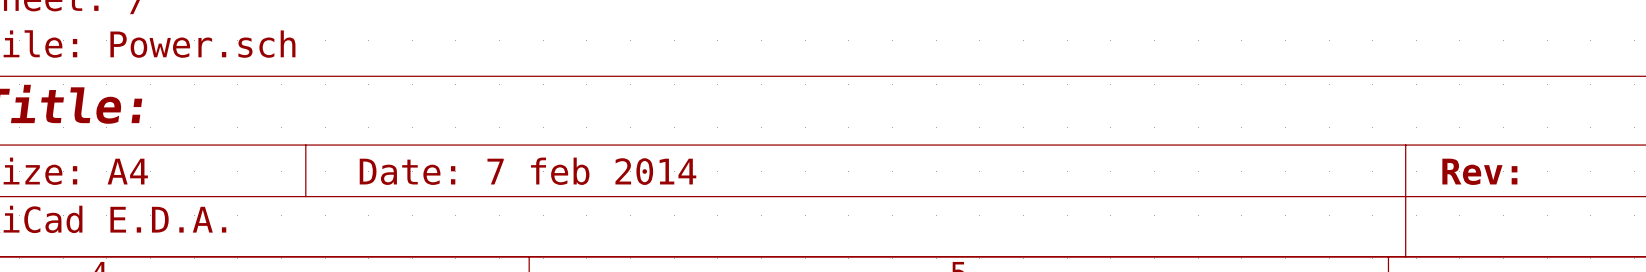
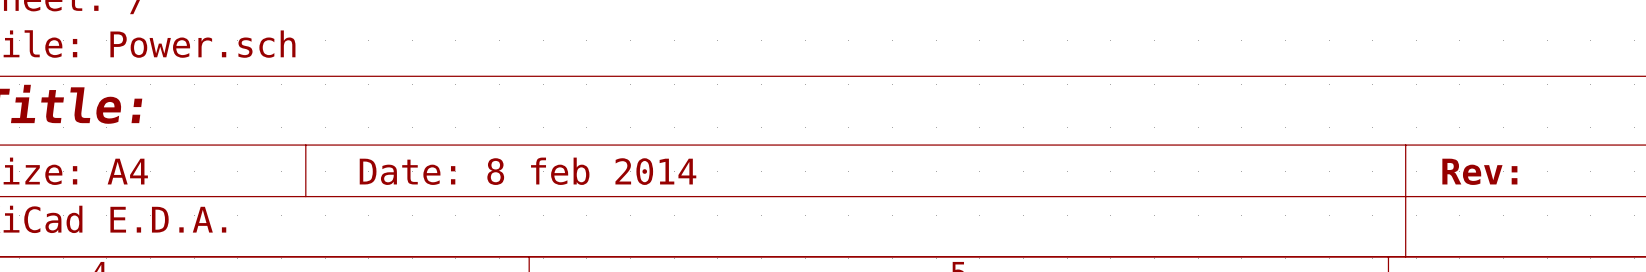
title block: Date: 7 feb 2014 (528, 171) -> Date: 8 feb 2014 (528, 171)

